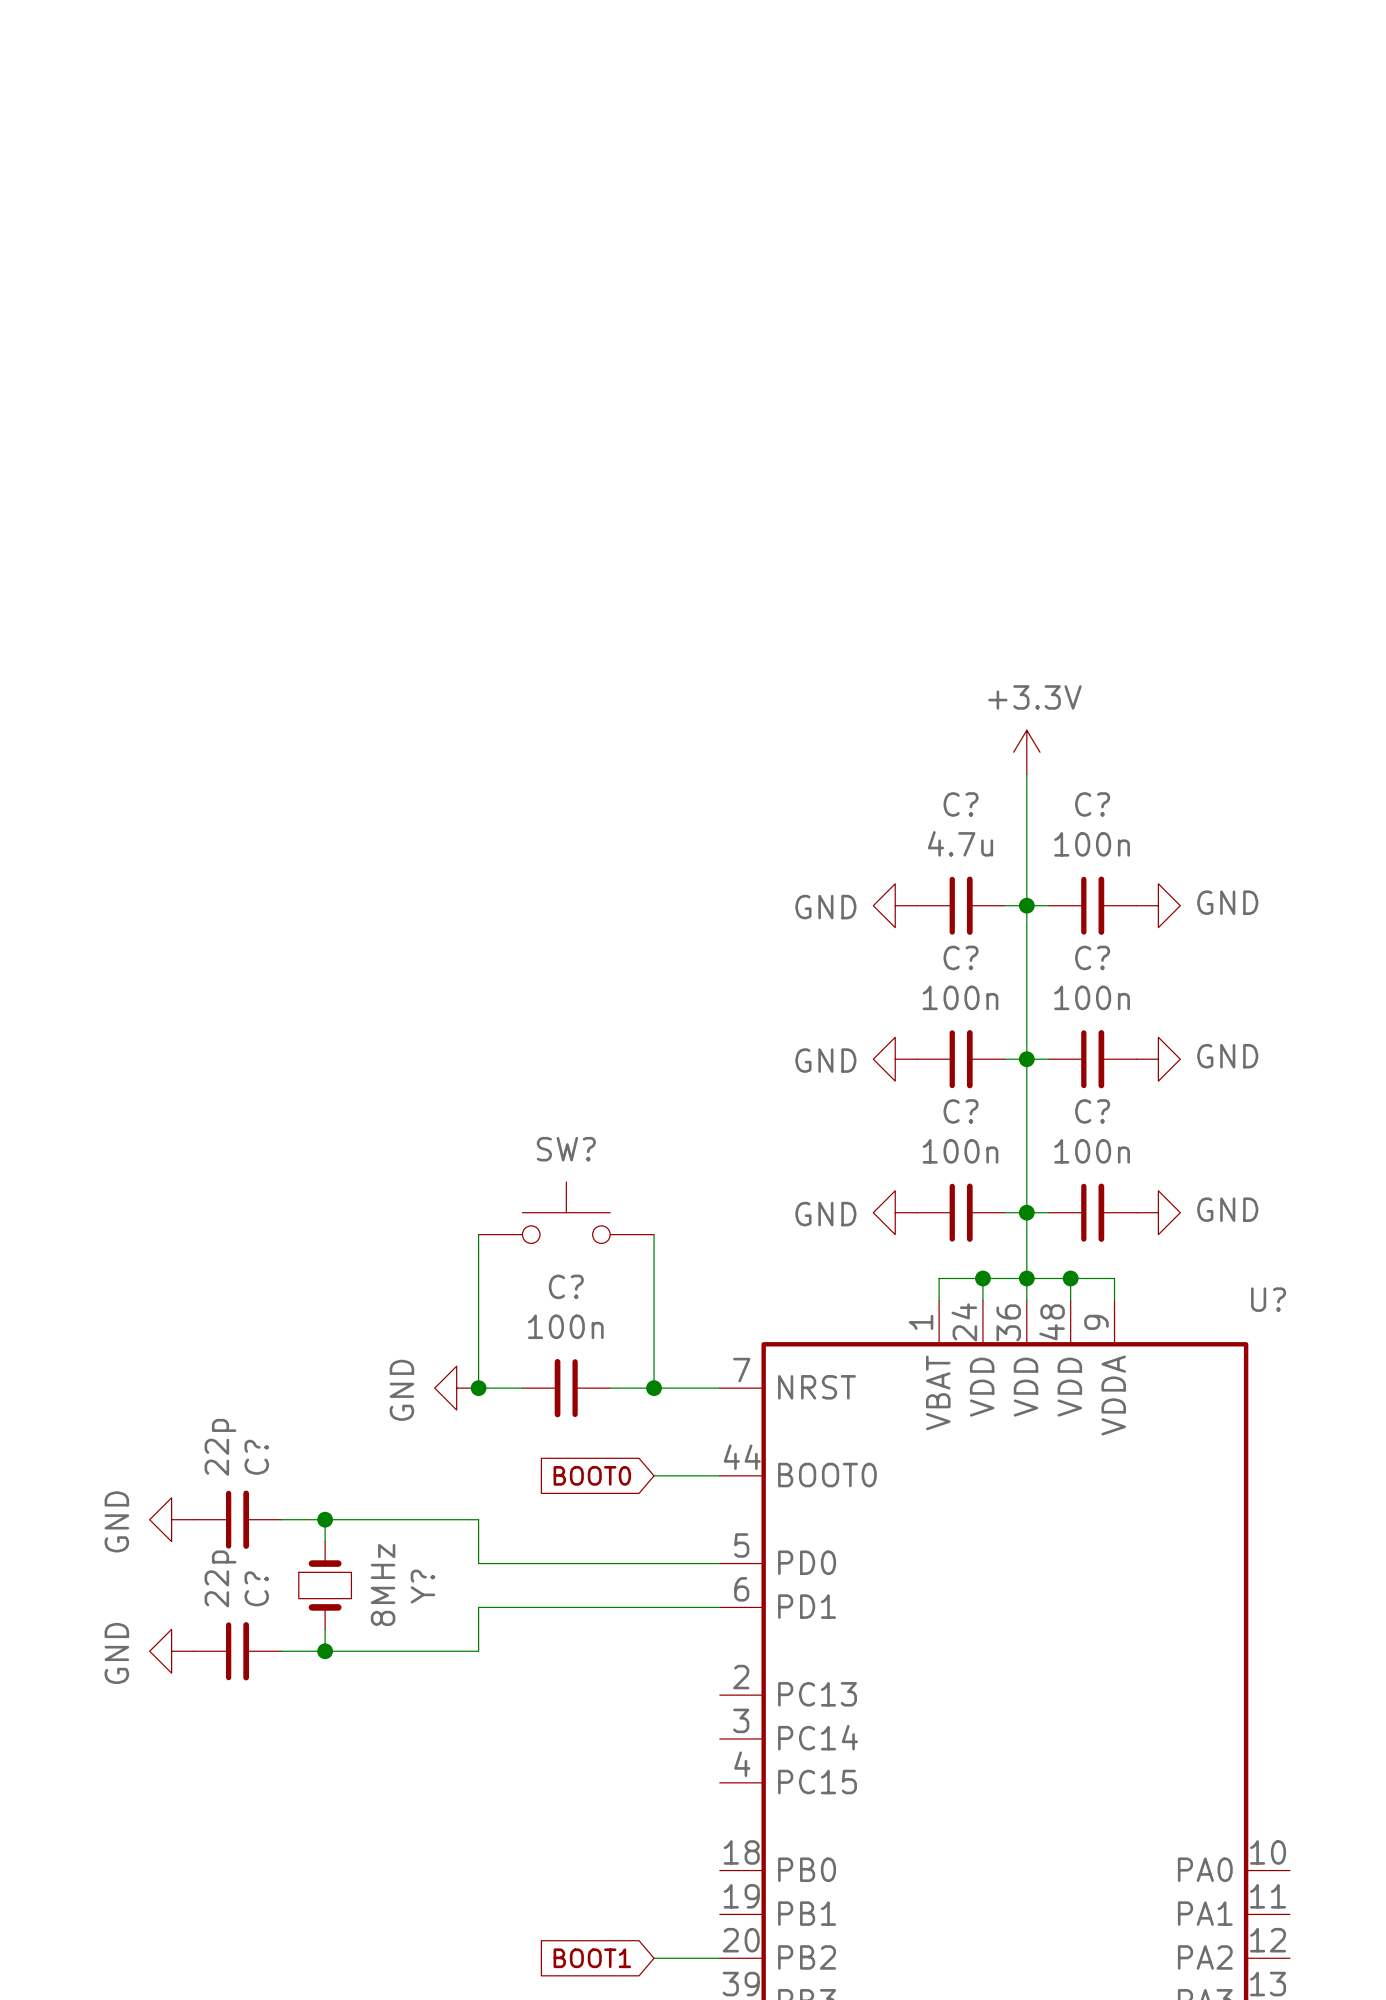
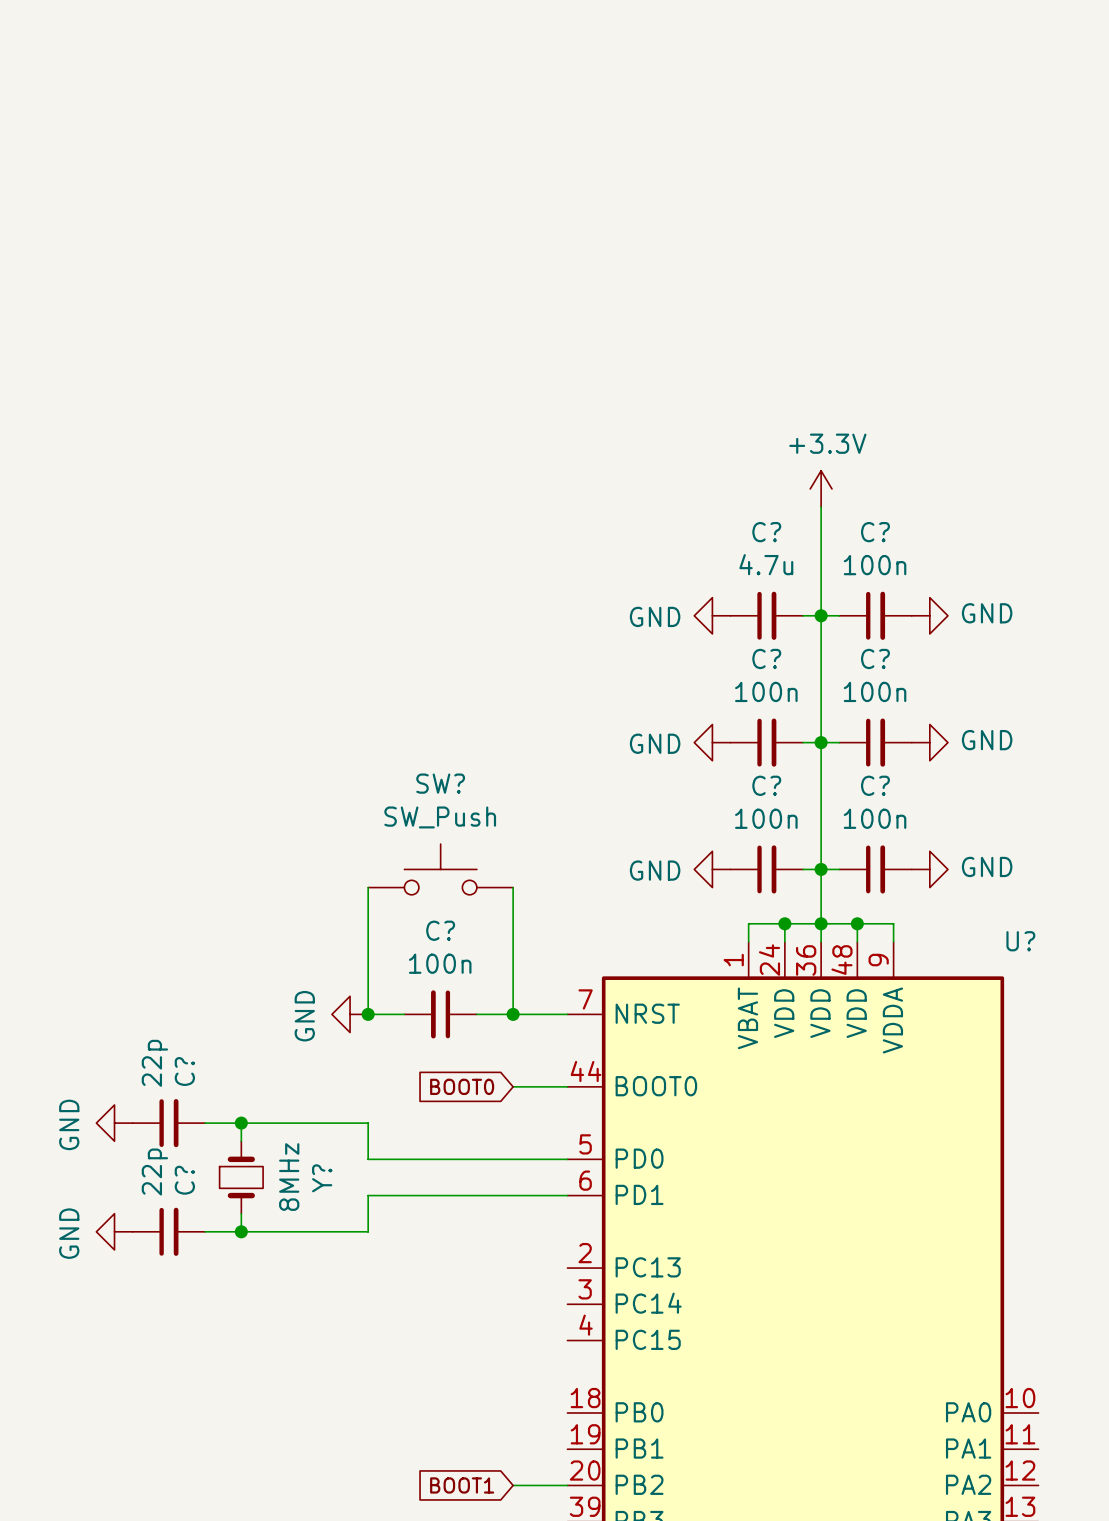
SW? value: none -> SW_Push (440, 817)
SW? name position: SW? (566, 1149) -> SW? (440, 783)

